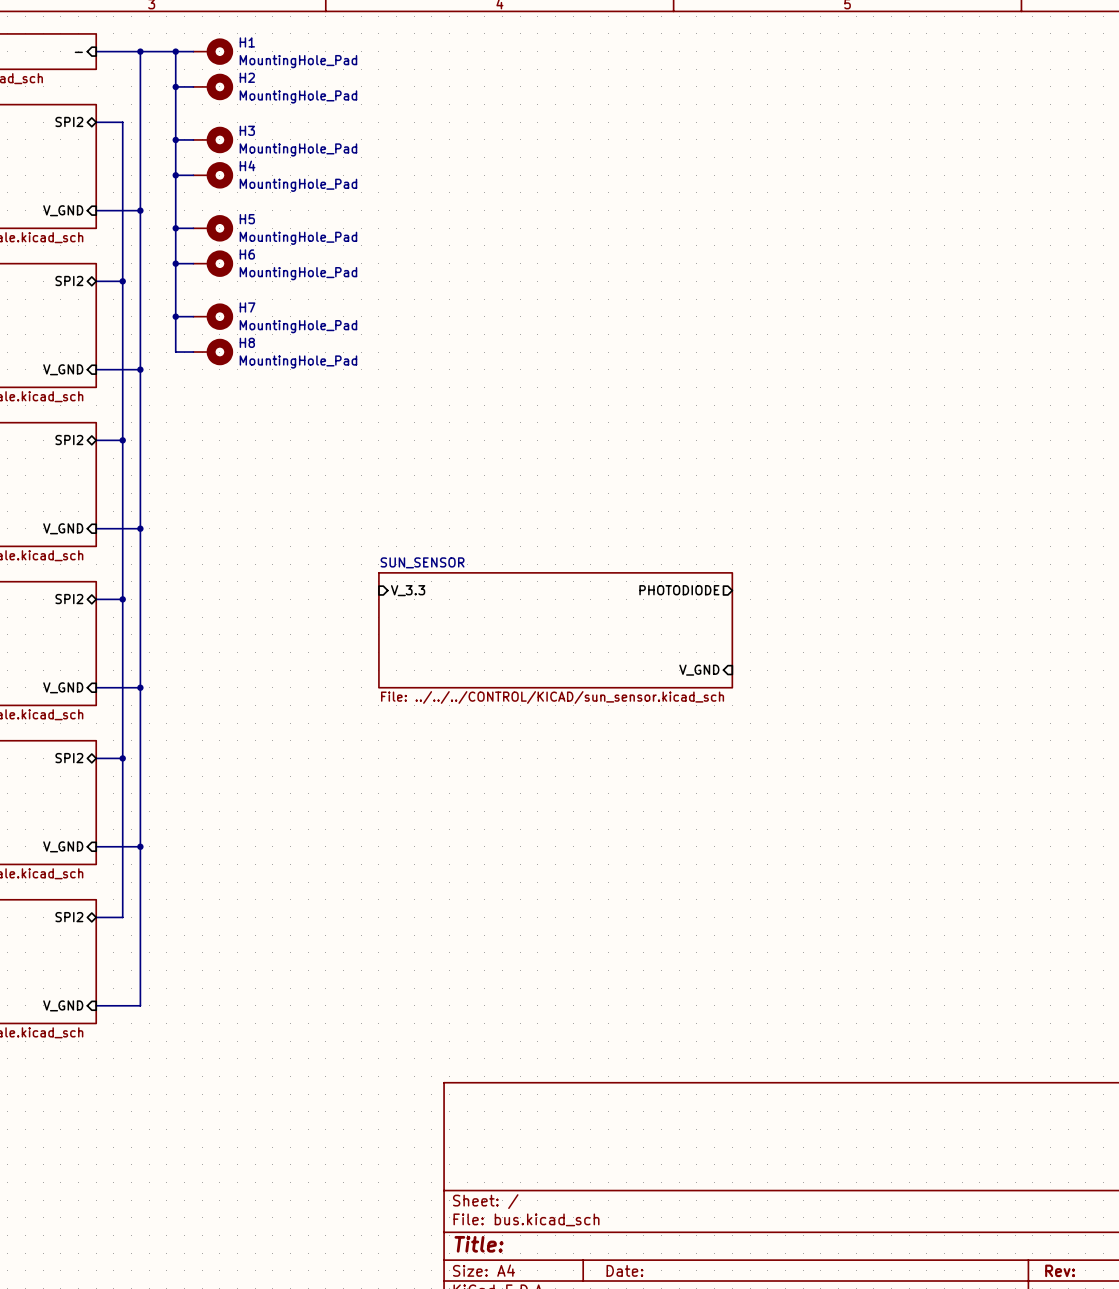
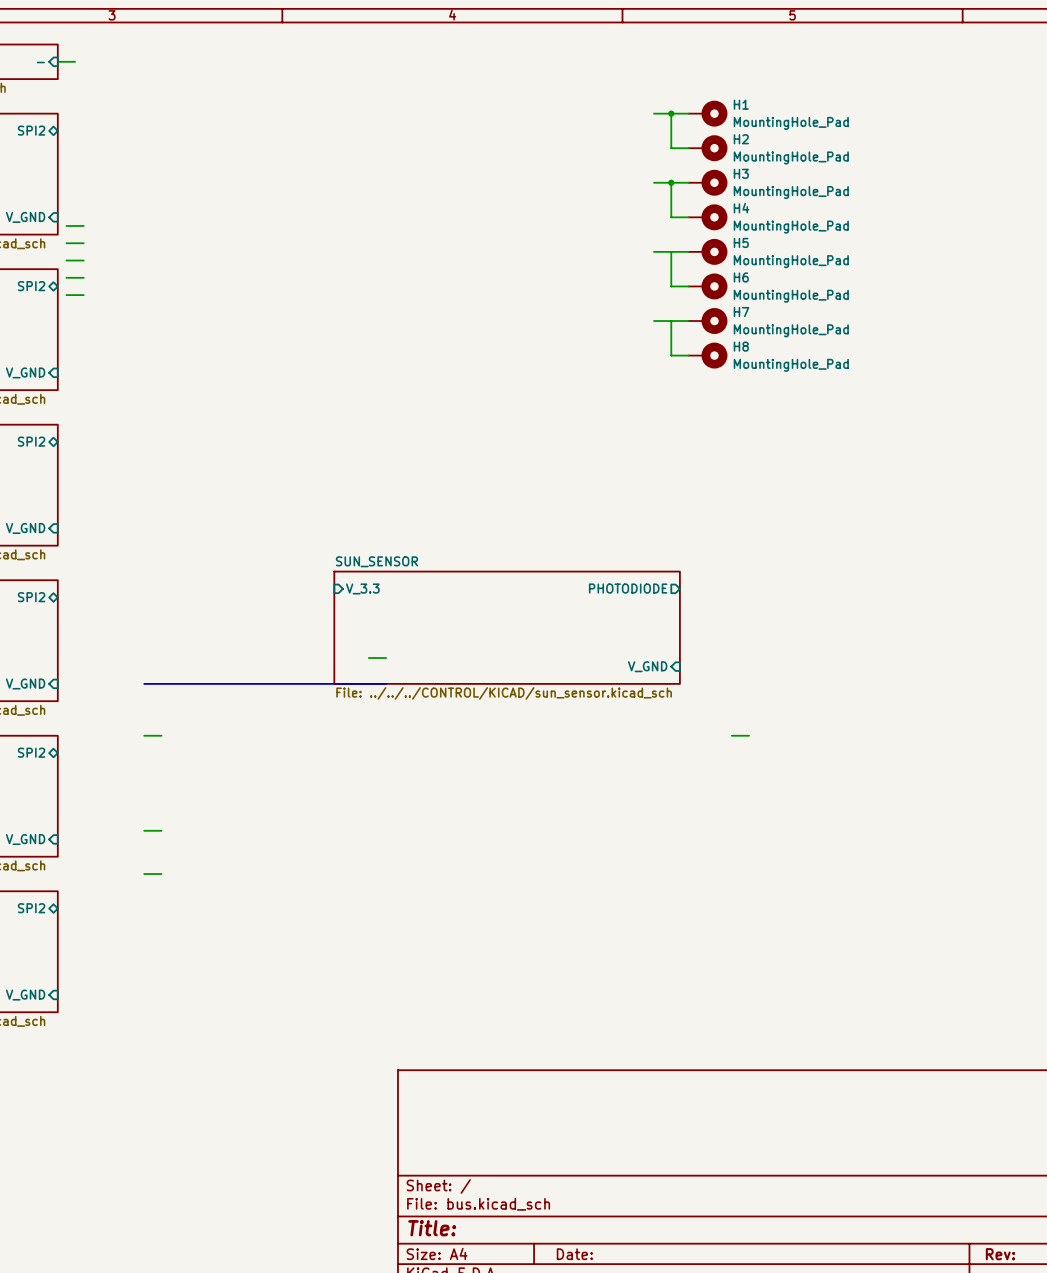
wire: (113, 51) (193, 51) -> none
wire: (140, 51) (140, 1005) (96, 1005) -> none
junction: (140, 51) -> none
wire: (175, 51) (175, 352) (193, 352) -> none
junction: (175, 51) -> none
H1 position: (213, 51) -> (708, 113)
wire: (175, 86) (193, 86) -> none
junction: (175, 86) -> none
H2 position: (213, 86) -> (708, 148)
wire: none -> (654, 113) (688, 113)
wire: none -> (671, 113) (671, 148) (688, 148)
junction: none -> (671, 113)
bus: (96, 122) (122, 122) (122, 917) (96, 917) -> none
wire: (175, 139) (193, 139) -> (66, 277) (83, 277)
junction: (175, 139) -> none
H3 position: (213, 139) -> (708, 182)
wire: (175, 175) (193, 175) -> (66, 243) (83, 243)
junction: (175, 175) -> none
H4 position: (213, 175) -> (708, 217)
wire: none -> (654, 182) (688, 182)
wire: none -> (671, 182) (671, 217) (688, 217)
junction: none -> (671, 182)
wire: (96, 210) (140, 210) -> none
junction: (140, 210) -> none
wire: (175, 228) (193, 228) -> (66, 225) (83, 225)
junction: (175, 228) -> none
H5 position: (213, 228) -> (708, 251)
wire: none -> (654, 251) (688, 251)
wire: none -> (671, 251) (671, 286) (688, 286)
wire: (175, 263) (193, 263) -> (66, 260) (83, 260)
junction: (175, 263) -> none
H6 position: (213, 263) -> (708, 286)
bus: (96, 281) (122, 281) -> none
junction: (122, 281) -> none
wire: (175, 316) (193, 316) -> (66, 295) (83, 295)
junction: (175, 316) -> none
H7 position: (213, 316) -> (708, 321)
wire: none -> (654, 321) (688, 321)
wire: none -> (671, 321) (671, 355) (688, 355)
H8 position: (213, 352) -> (708, 355)
wire: (96, 369) (140, 369) -> none
junction: (140, 369) -> none
bus: (96, 440) (122, 440) -> none
junction: (122, 440) -> none
wire: (96, 528) (140, 528) -> none
junction: (140, 528) -> none
bus: (96, 599) (122, 599) -> none
junction: (122, 599) -> none
wire: none -> (368, 657) (386, 657)
wire: (96, 687) (140, 687) -> none
junction: (140, 687) -> none
bus: none -> (144, 683) (386, 683)
wire: none -> (144, 735) (161, 735)
wire: none -> (731, 735) (749, 735)
bus: (96, 758) (122, 758) -> none
junction: (122, 758) -> none
wire: none -> (144, 830) (161, 830)
wire: (96, 846) (140, 846) -> none
junction: (140, 846) -> none
wire: none -> (144, 873) (161, 873)

